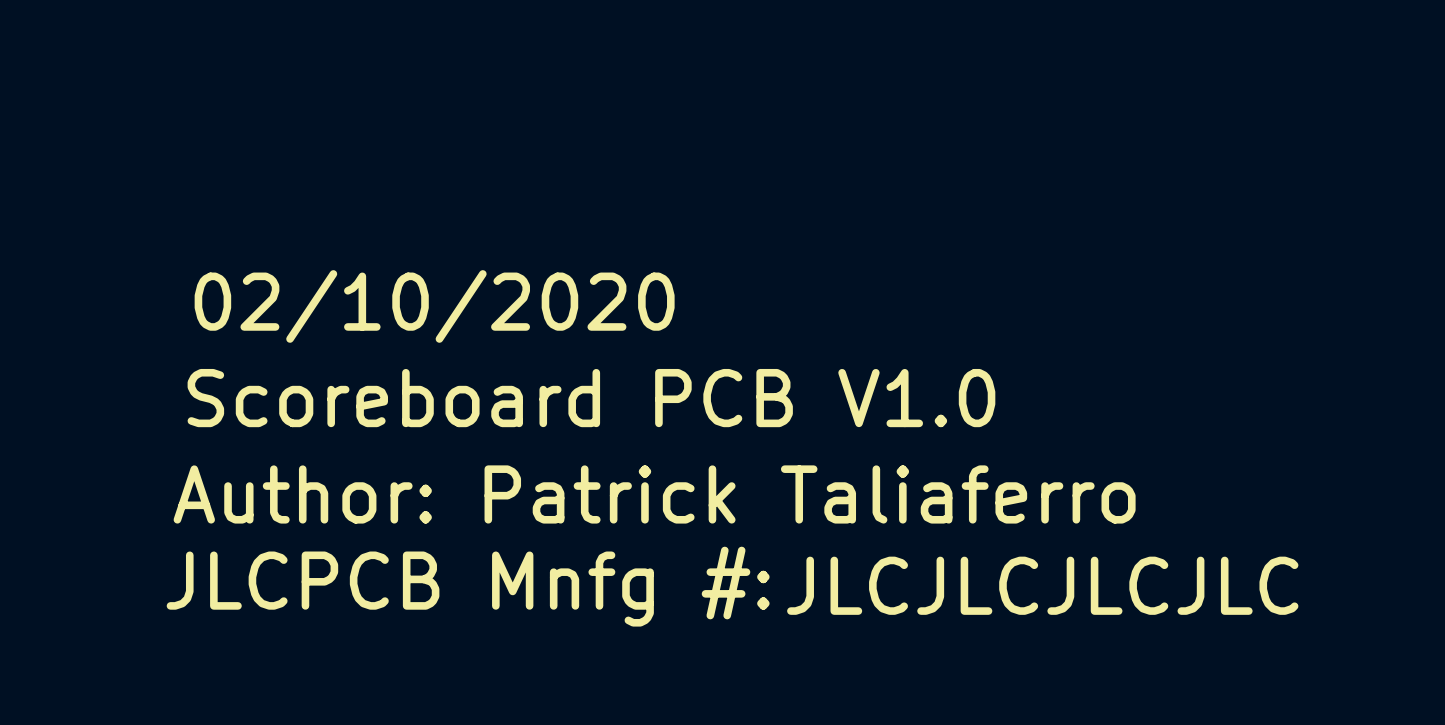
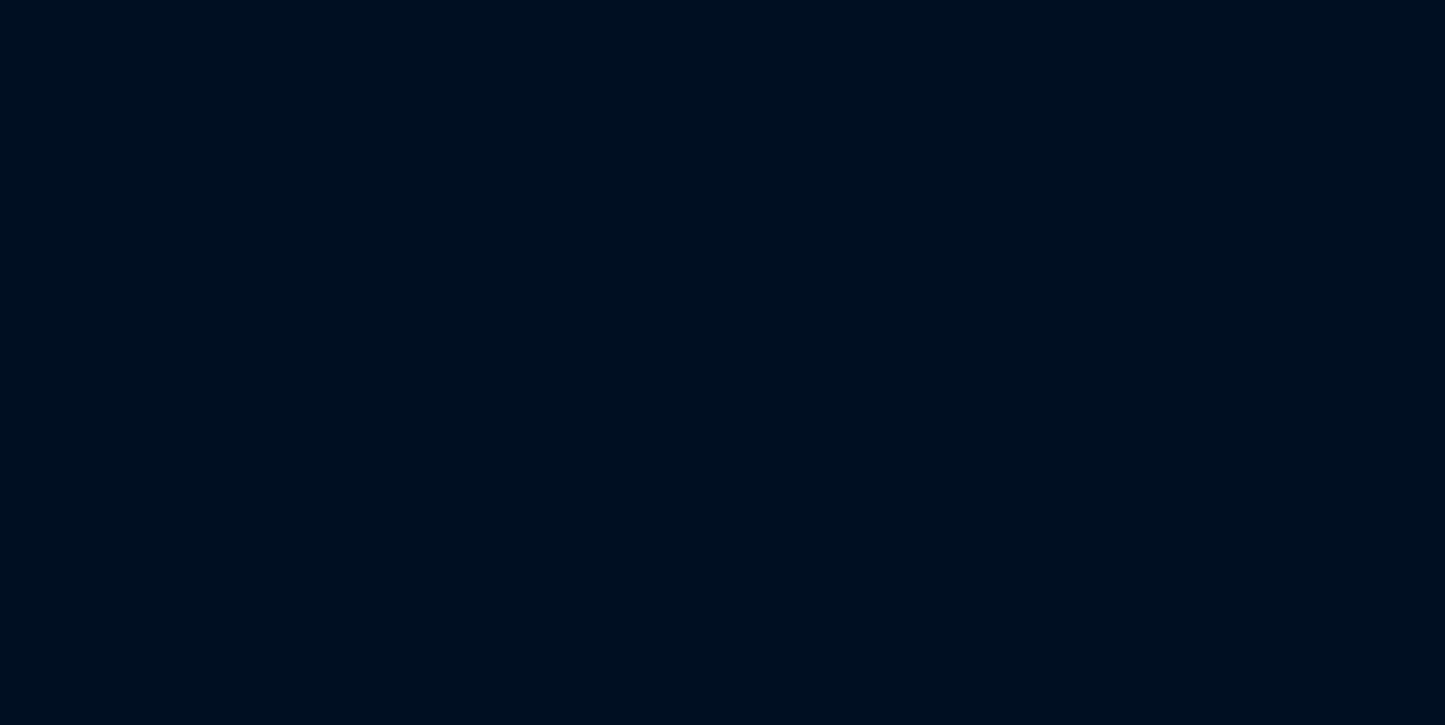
text: 02/10/2020 (434, 306) -> none
text: Scoreboard PCB V1.0 (591, 398) -> none
text: Author: Patrick Taliaferro (654, 494) -> none
text: JLCJLCJLCJLC (1042, 585) -> none
text: JLCPCB Mnfg #: (468, 586) -> none

